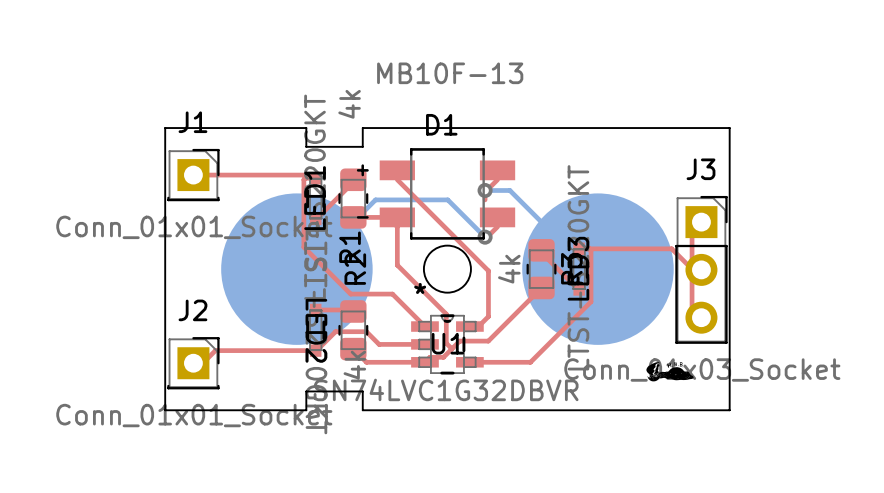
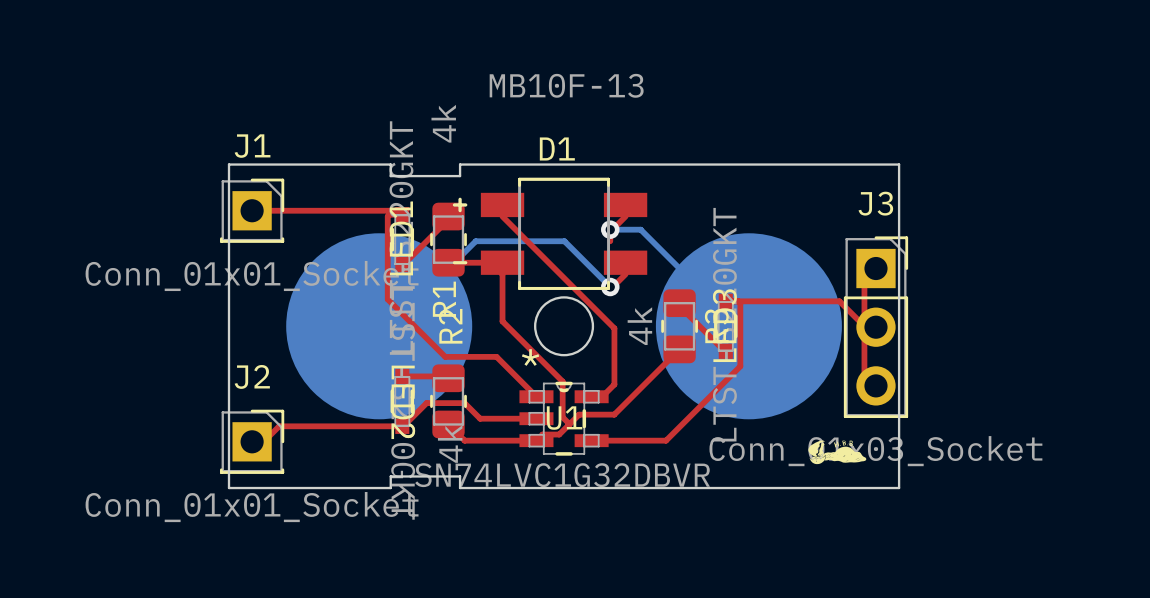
board edge: (306, 137) (306, 128) (165, 128) (165, 410) (306, 410) (306, 400) -> (390, 164) (229, 164) (229, 488) (390, 488)
board edge: (362, 137) (362, 128) (729, 128) (729, 410) (362, 410) (362, 400) -> (460, 164) (899, 164) (899, 488) (460, 488)

